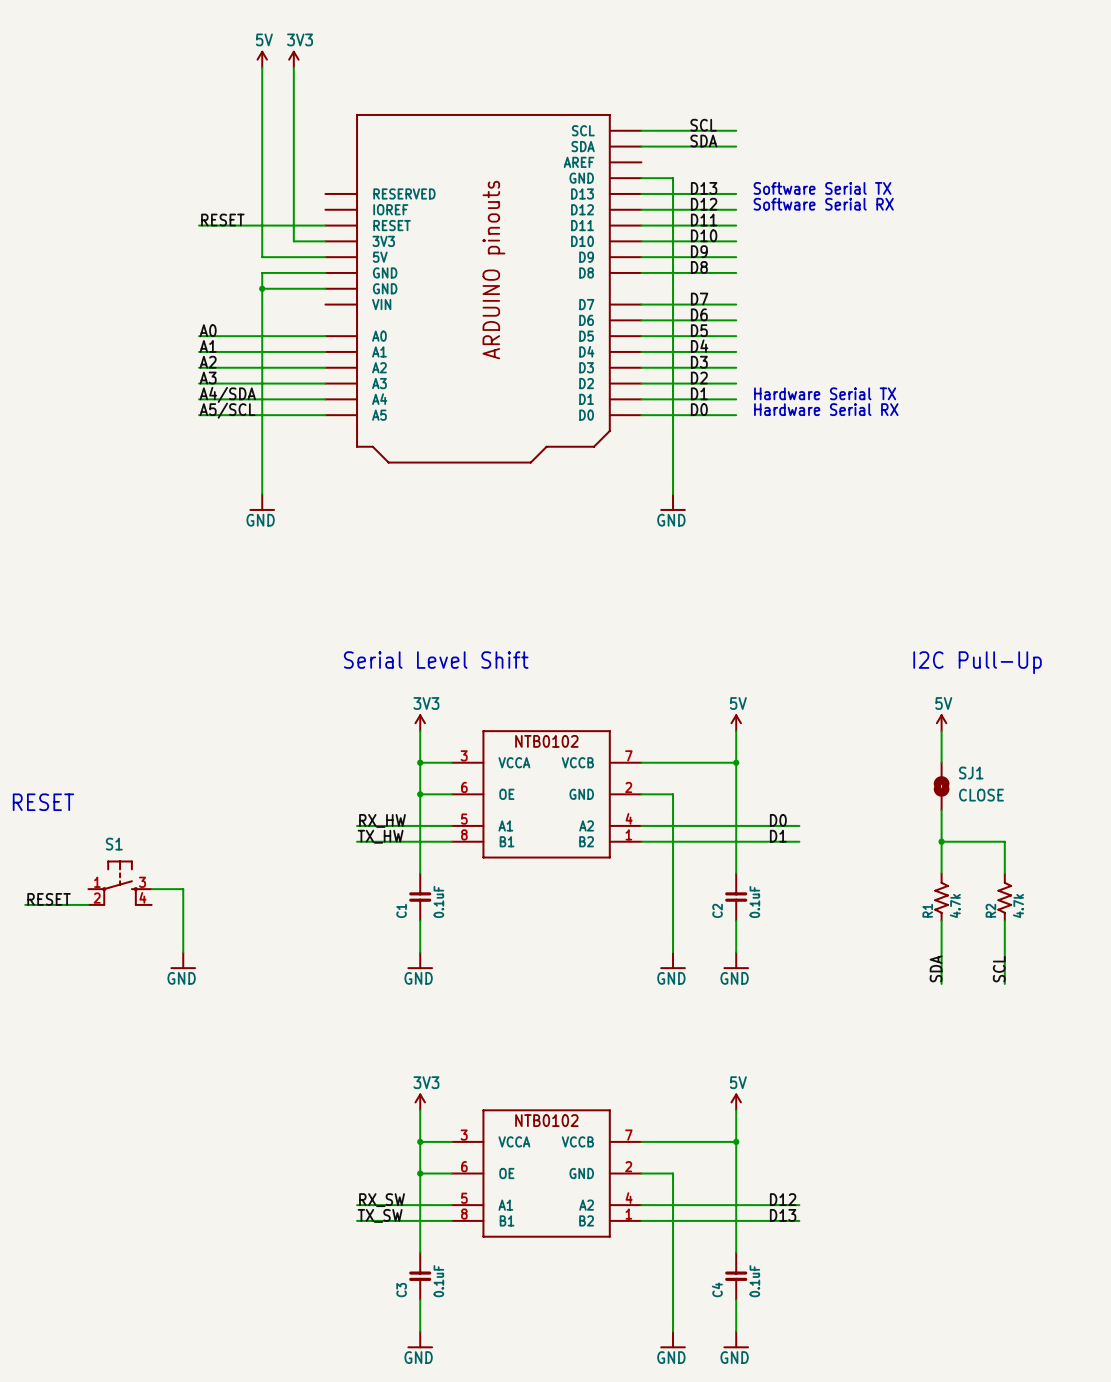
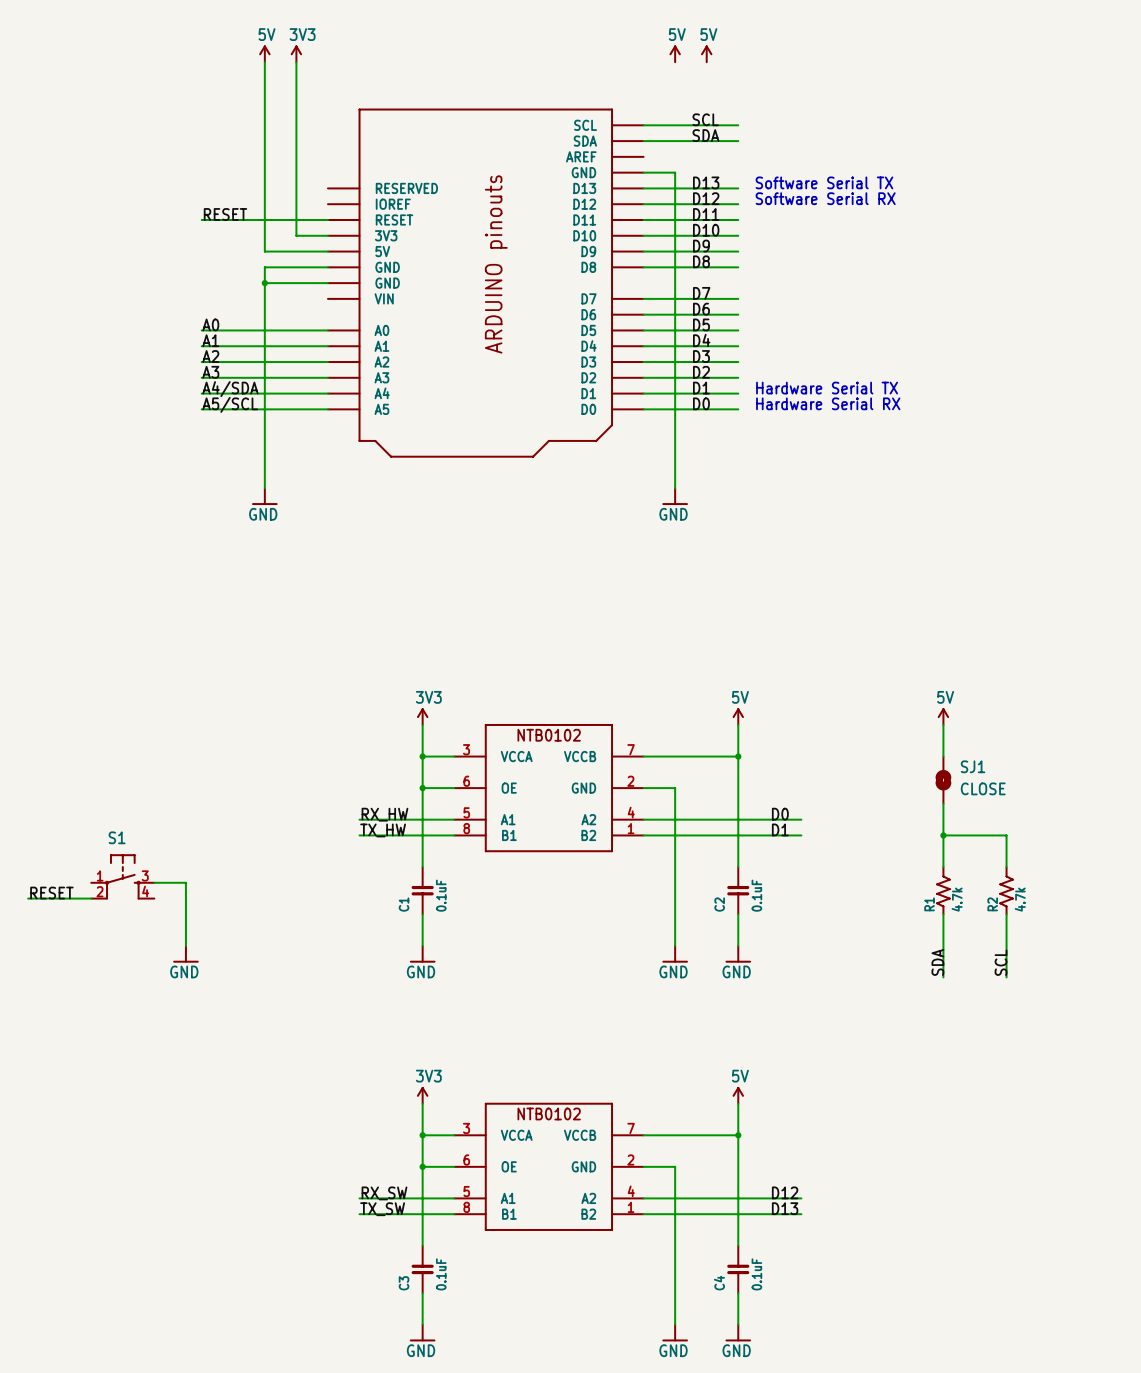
power symbol: none -> 5V (675, 53)
power symbol: none -> 5V (706, 53)
text: Serial Level Shift (436, 660) -> none
text: I2C Pull-Up (977, 662) -> none
text: RESET (43, 802) -> none

